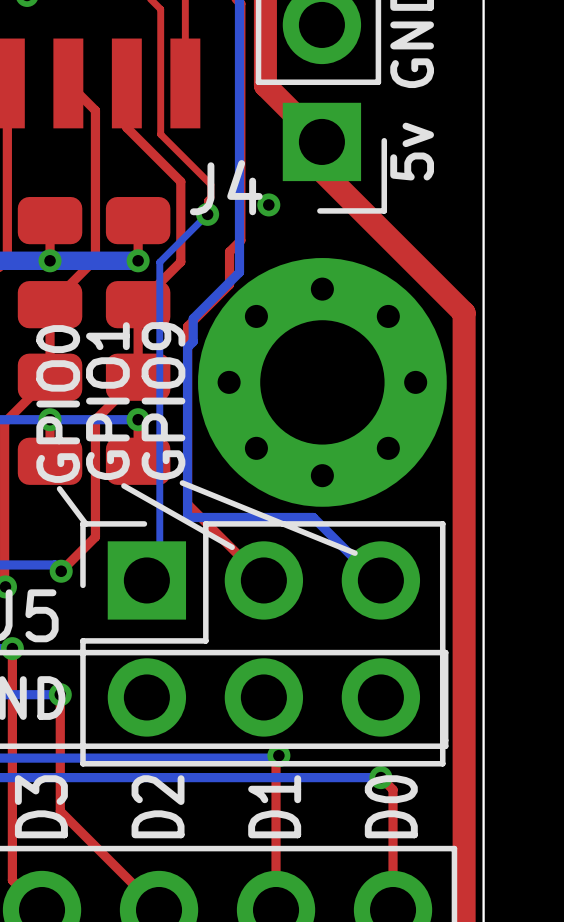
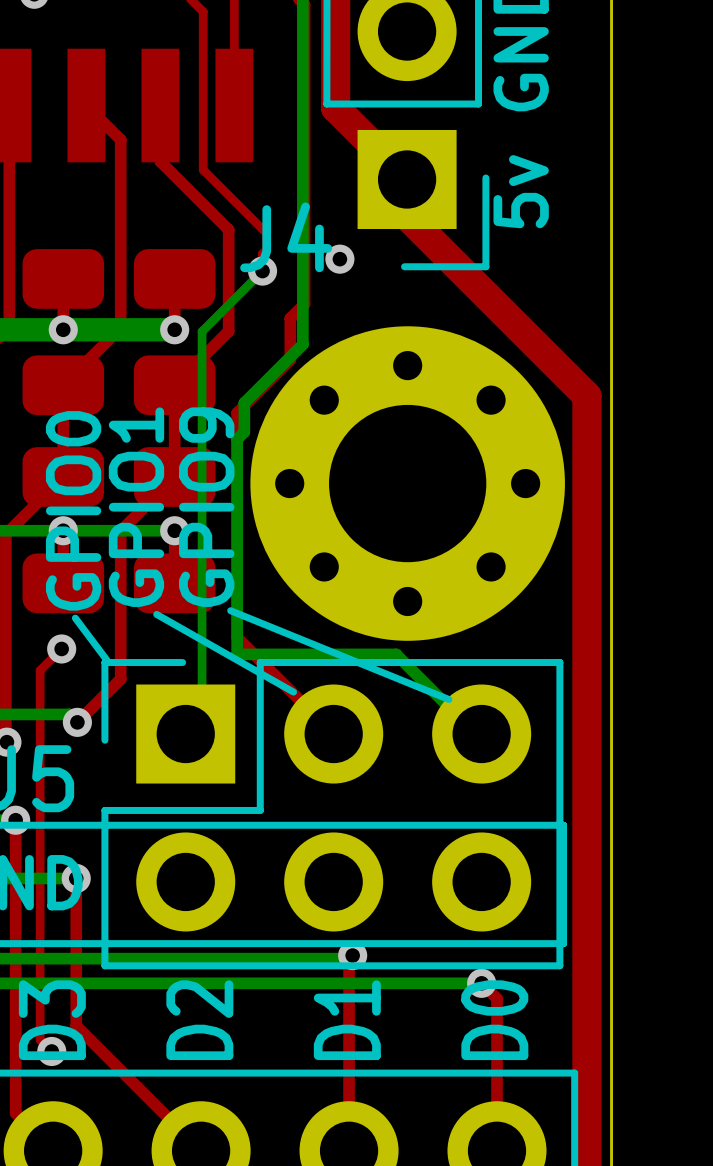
top track: none -> (61, 648) (40, 670) (40, 1039) (51, 1051)
via: none -> (61, 648)
via: none -> (51, 1051)

